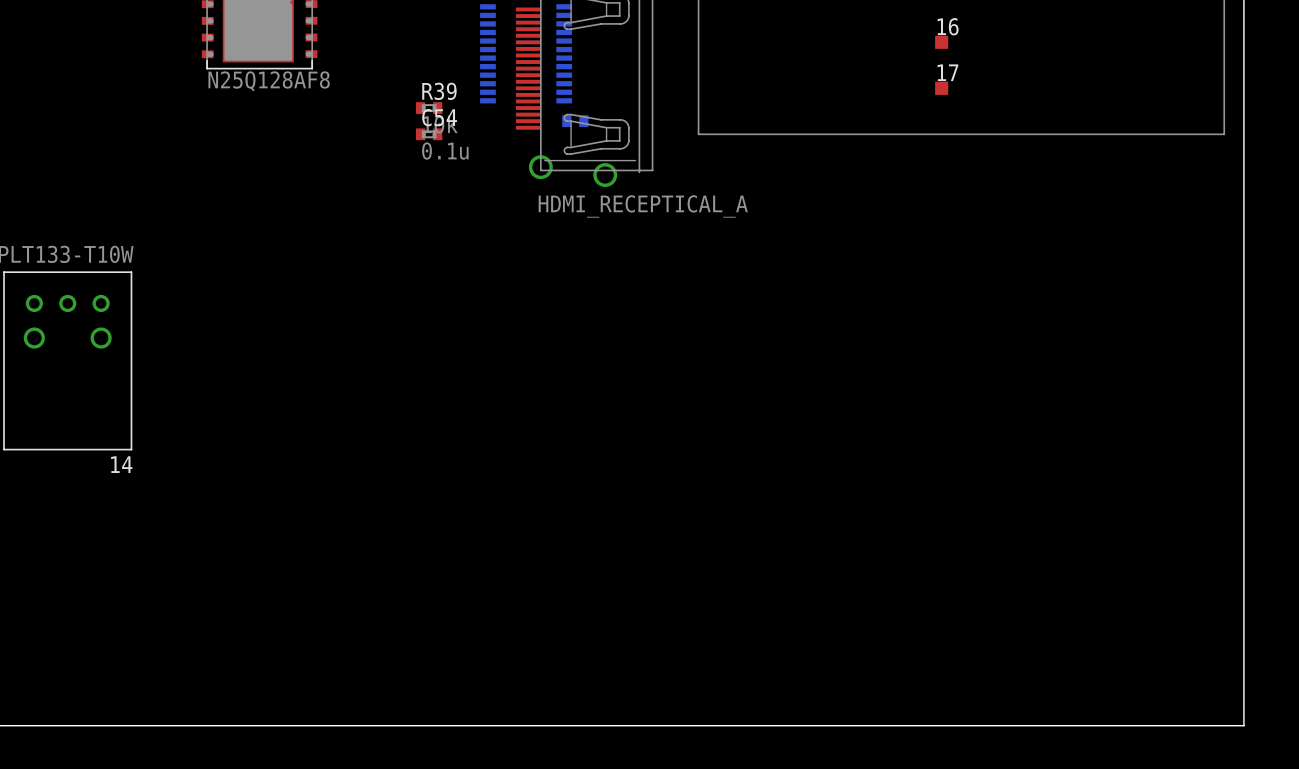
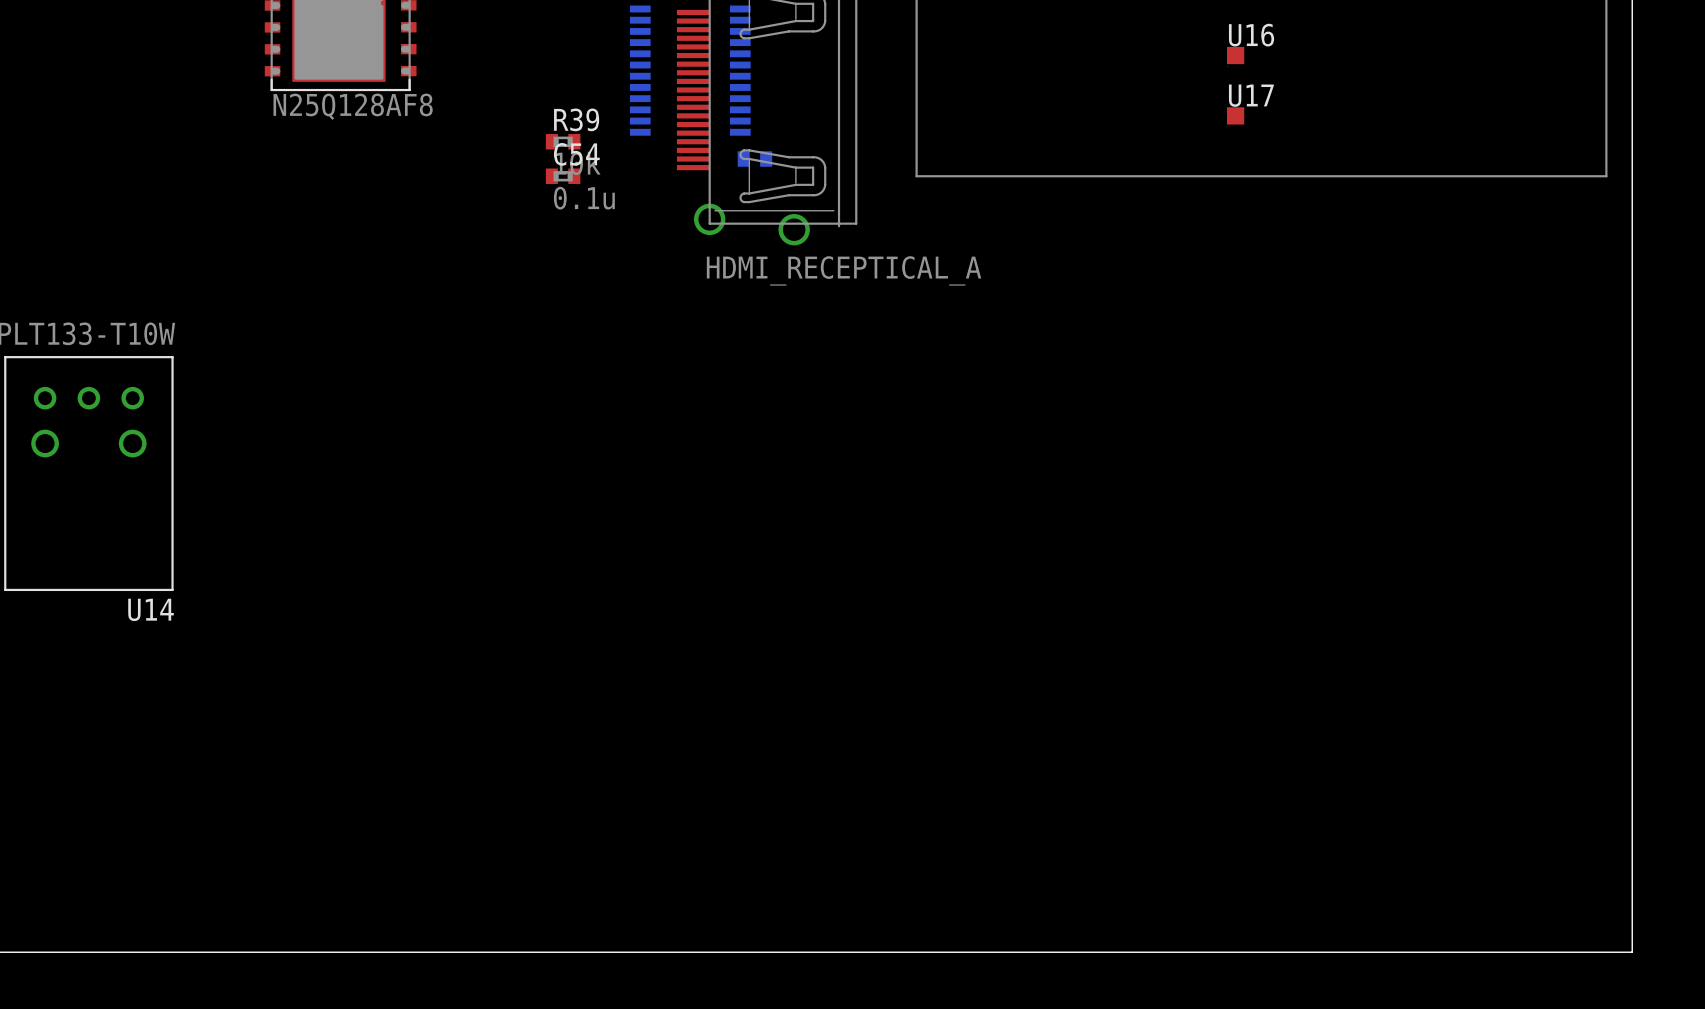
16 name: 16 (948, 26) -> U16 (1251, 35)
17 name: 17 (947, 72) -> U17 (1251, 95)
14 name: 14 (121, 464) -> U14 (151, 609)

